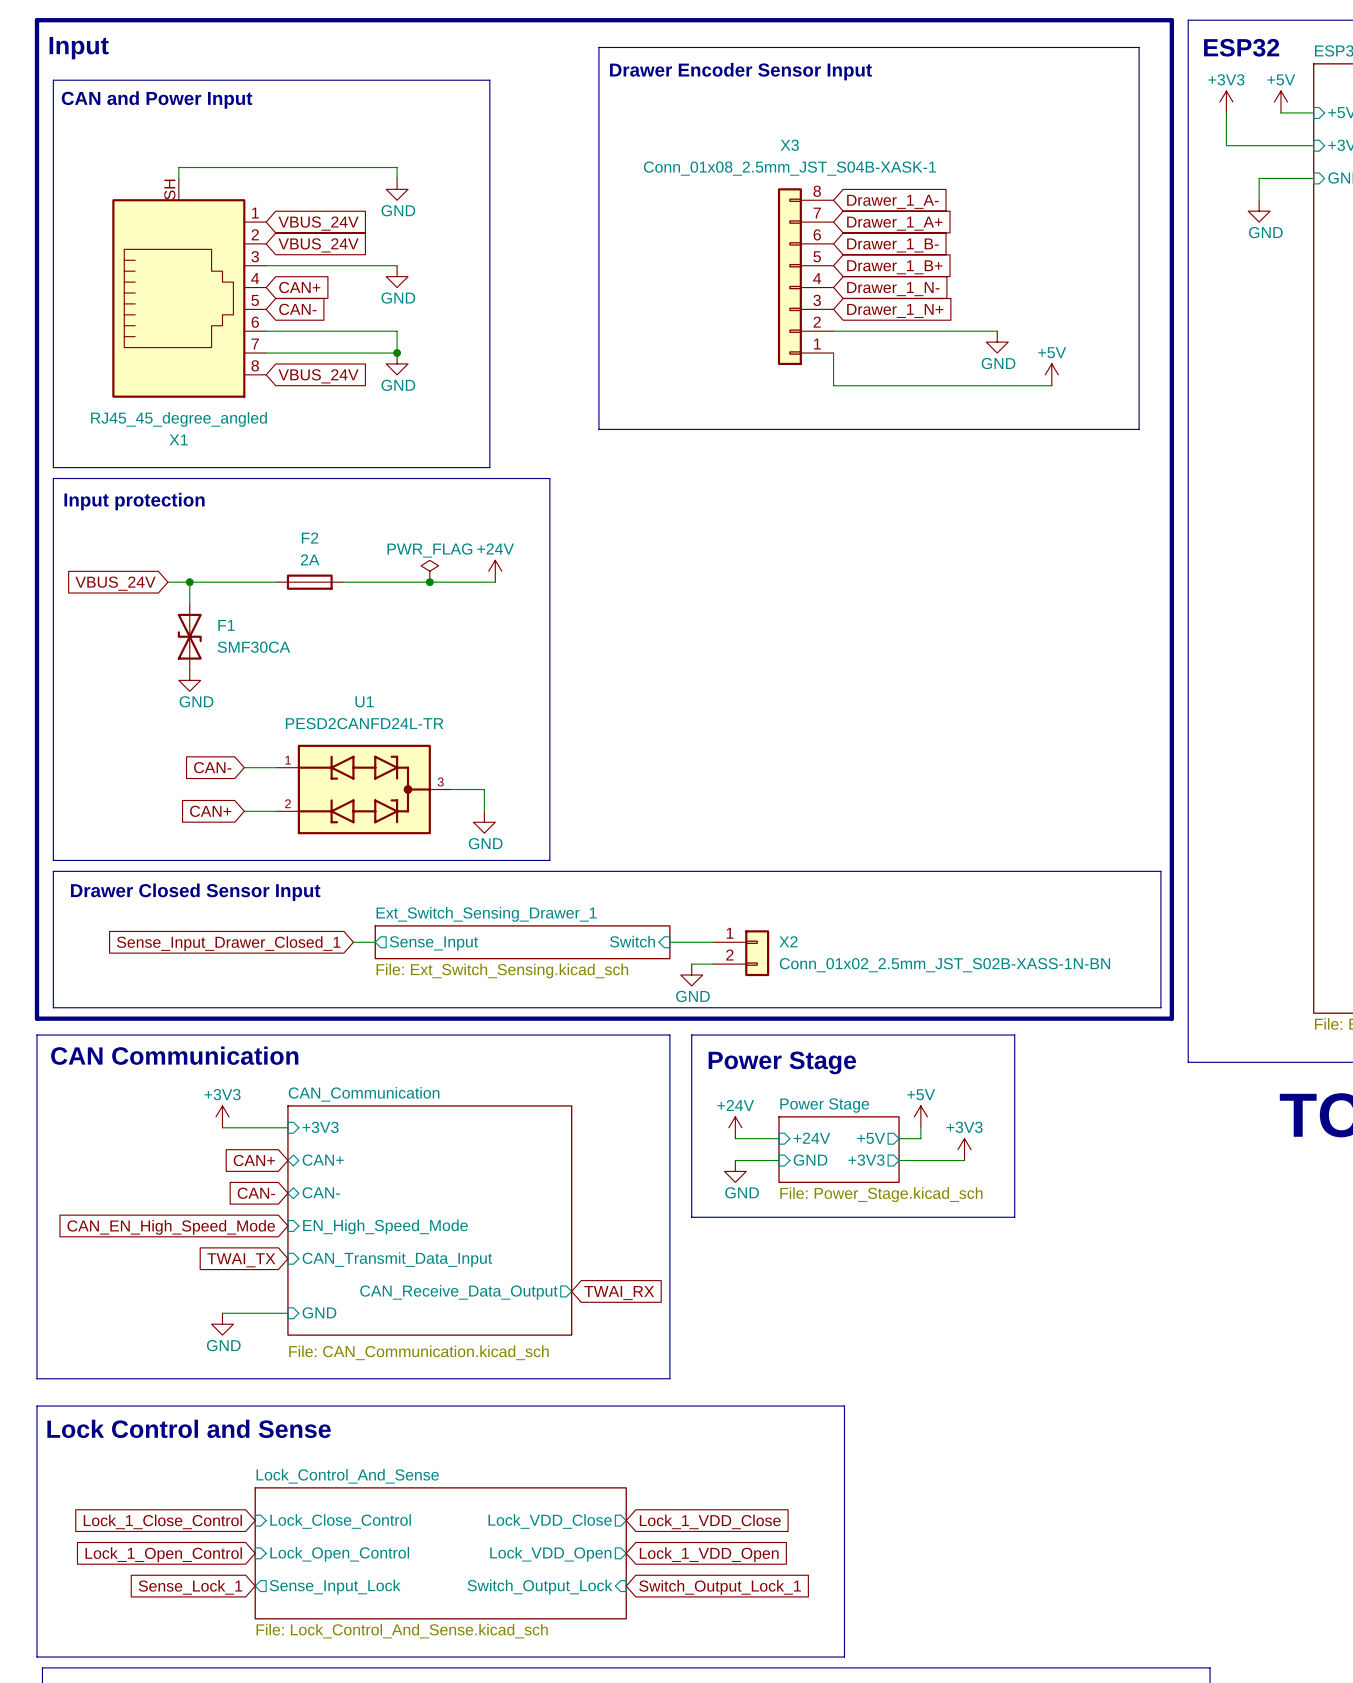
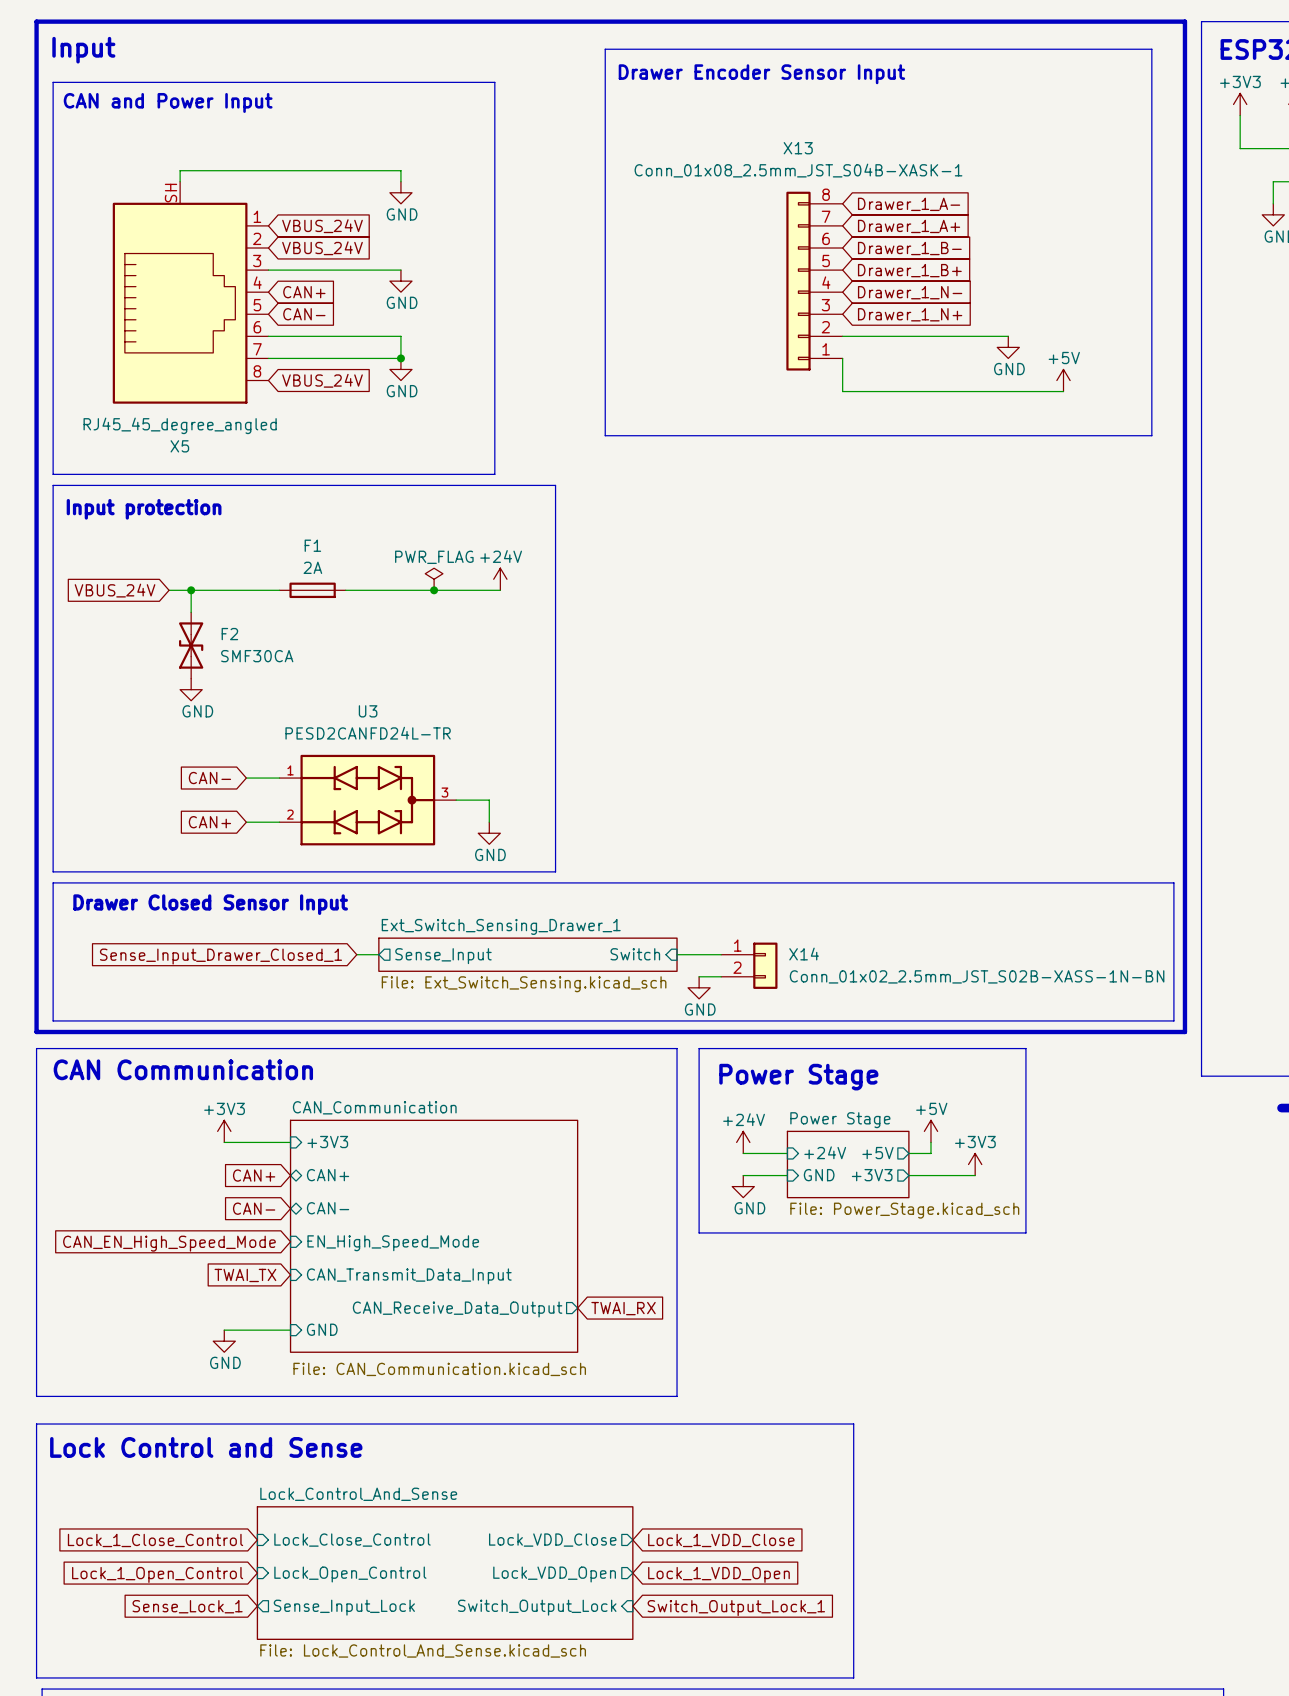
X3 name: X3 (789, 145) -> X13 (798, 148)
X1 name: X1 (178, 439) -> X5 (179, 446)
F2 name: F2 (310, 538) -> F1 (312, 545)
F1 name: F1 (226, 625) -> F2 (229, 634)
U1 name: U1 (364, 701) -> U3 (368, 711)
X2 name: X2 (788, 941) -> X14 (804, 954)

